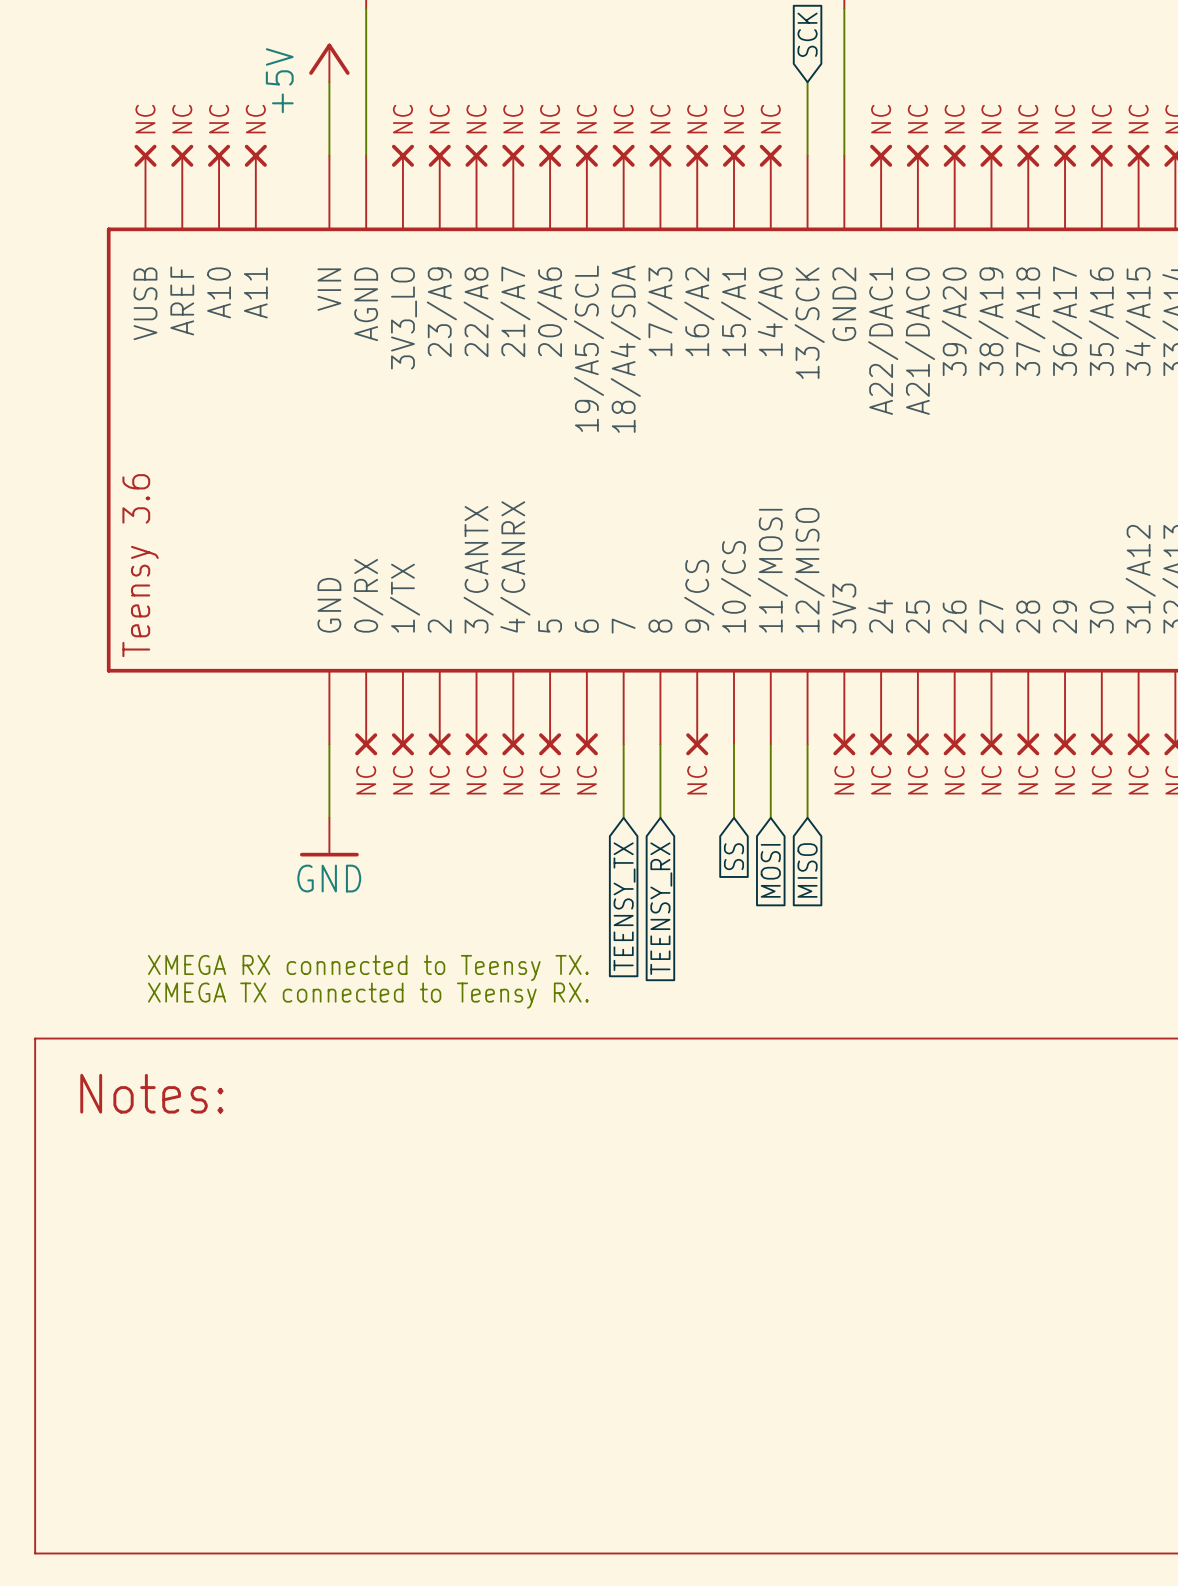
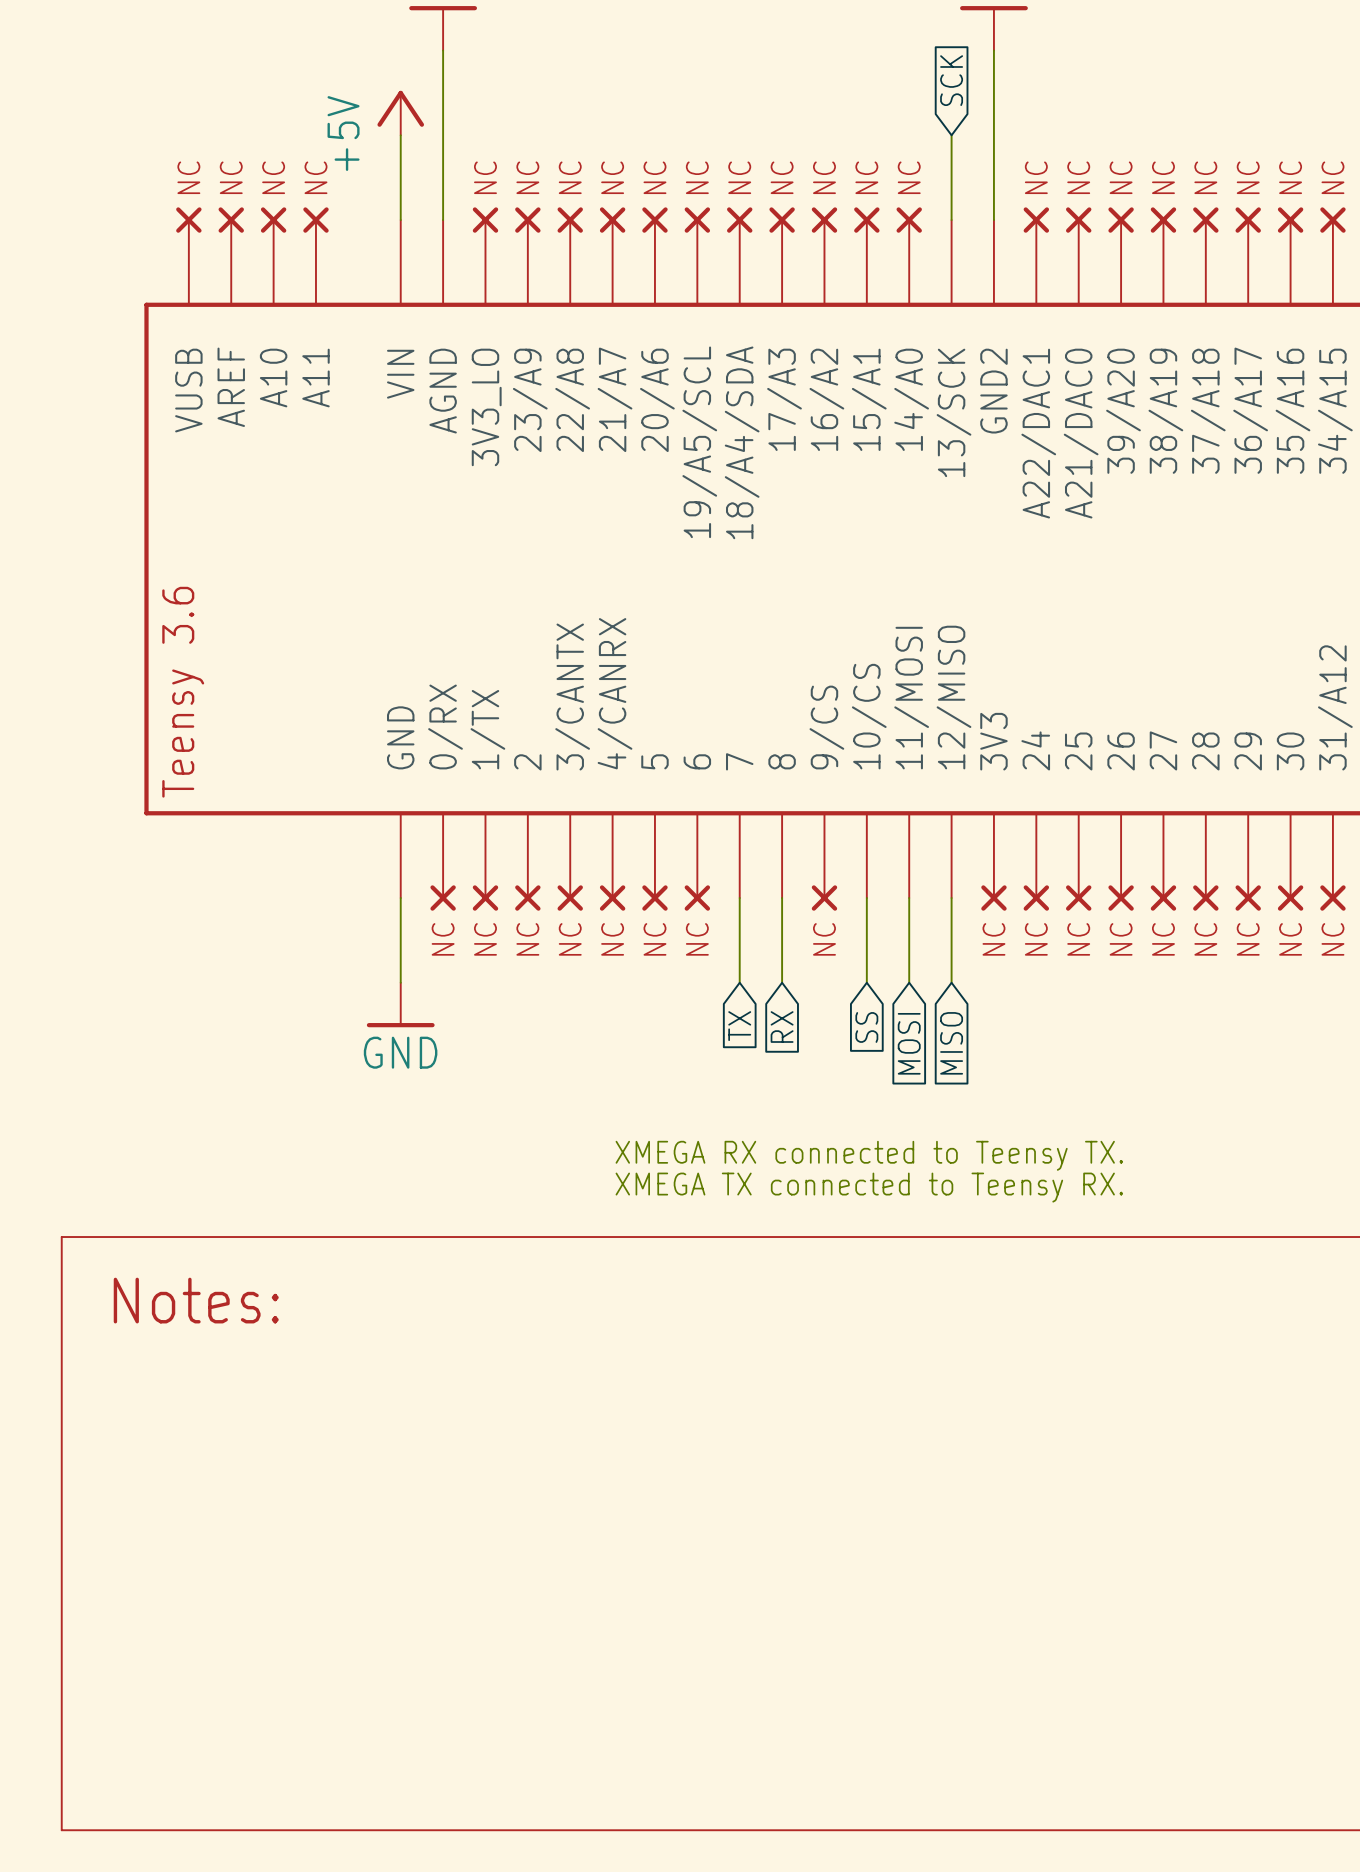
global label: TEENSY_TX (624, 906) -> TX (739, 1026)
global label: TEENSY_RX (661, 908) -> RX (782, 1027)
text: XMEGA RX connected to Teensy TX. (368, 968) -> none
text: none -> XMEGA RX connected to Teensy TX. (869, 1155)
text: XMEGA TX connected to Teensy RX. (368, 995) -> none
text: none -> XMEGA TX connected to Teensy RX. (869, 1187)

